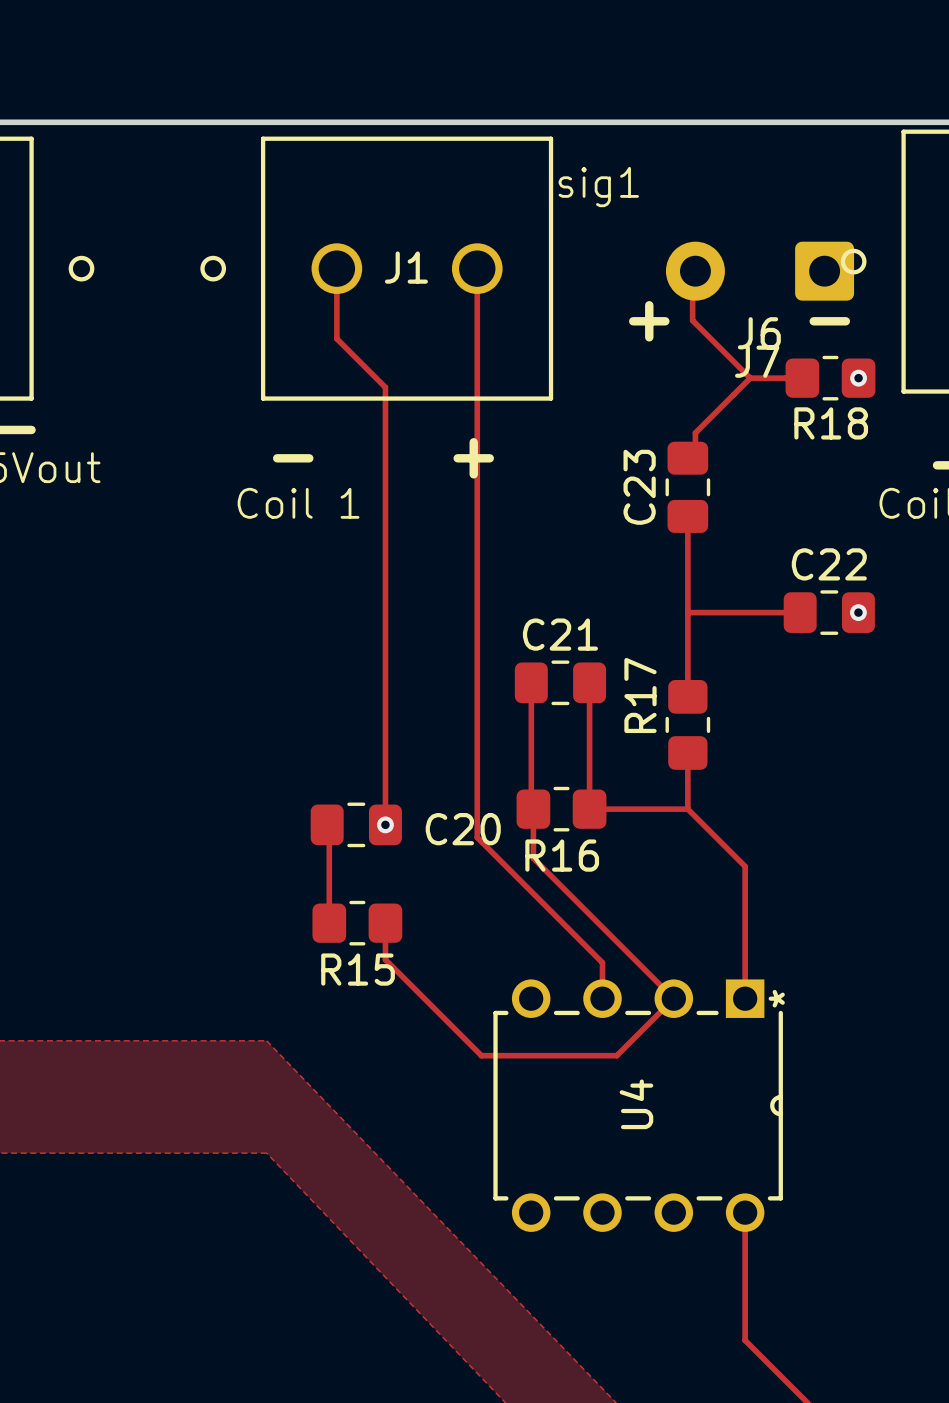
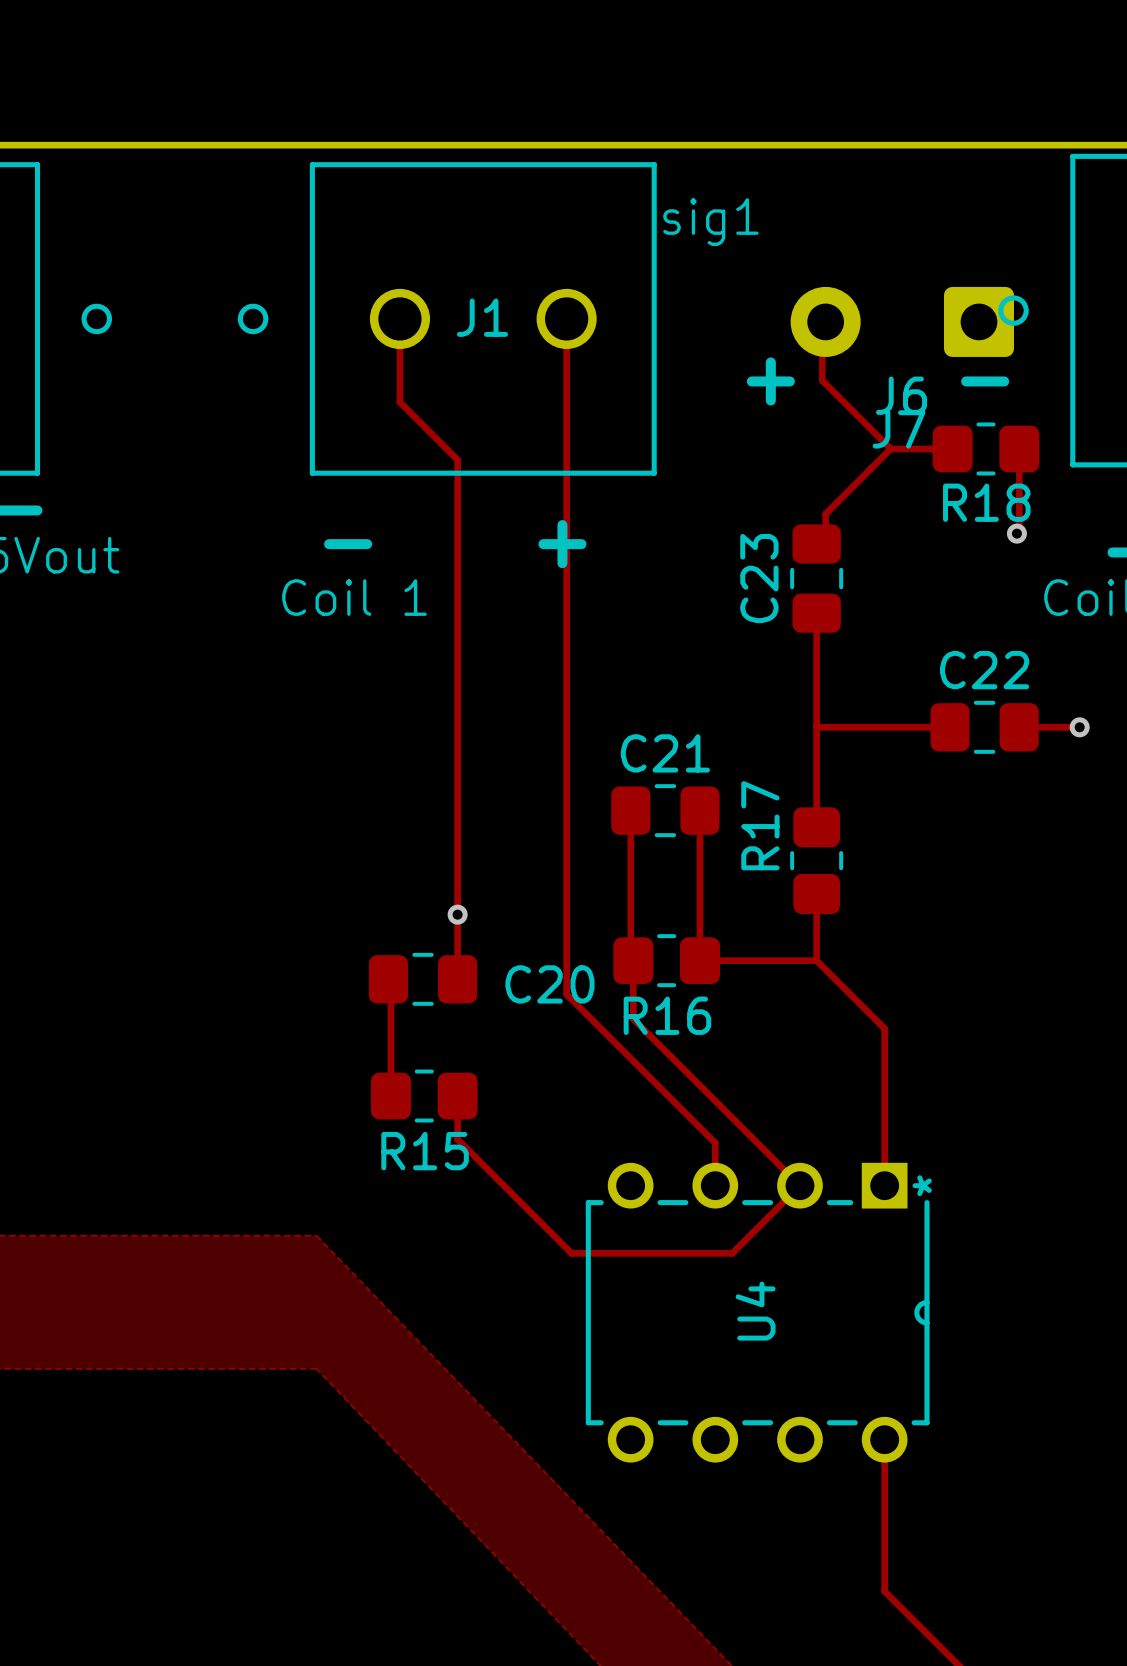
track: none -> (1019, 448) (1019, 531) (1016, 533)
via position: (858, 378) -> (1016, 533)
track: none -> (1019, 727) (1079, 727)
via position: (858, 612) -> (1079, 727)
via position: (385, 824) -> (457, 914)

